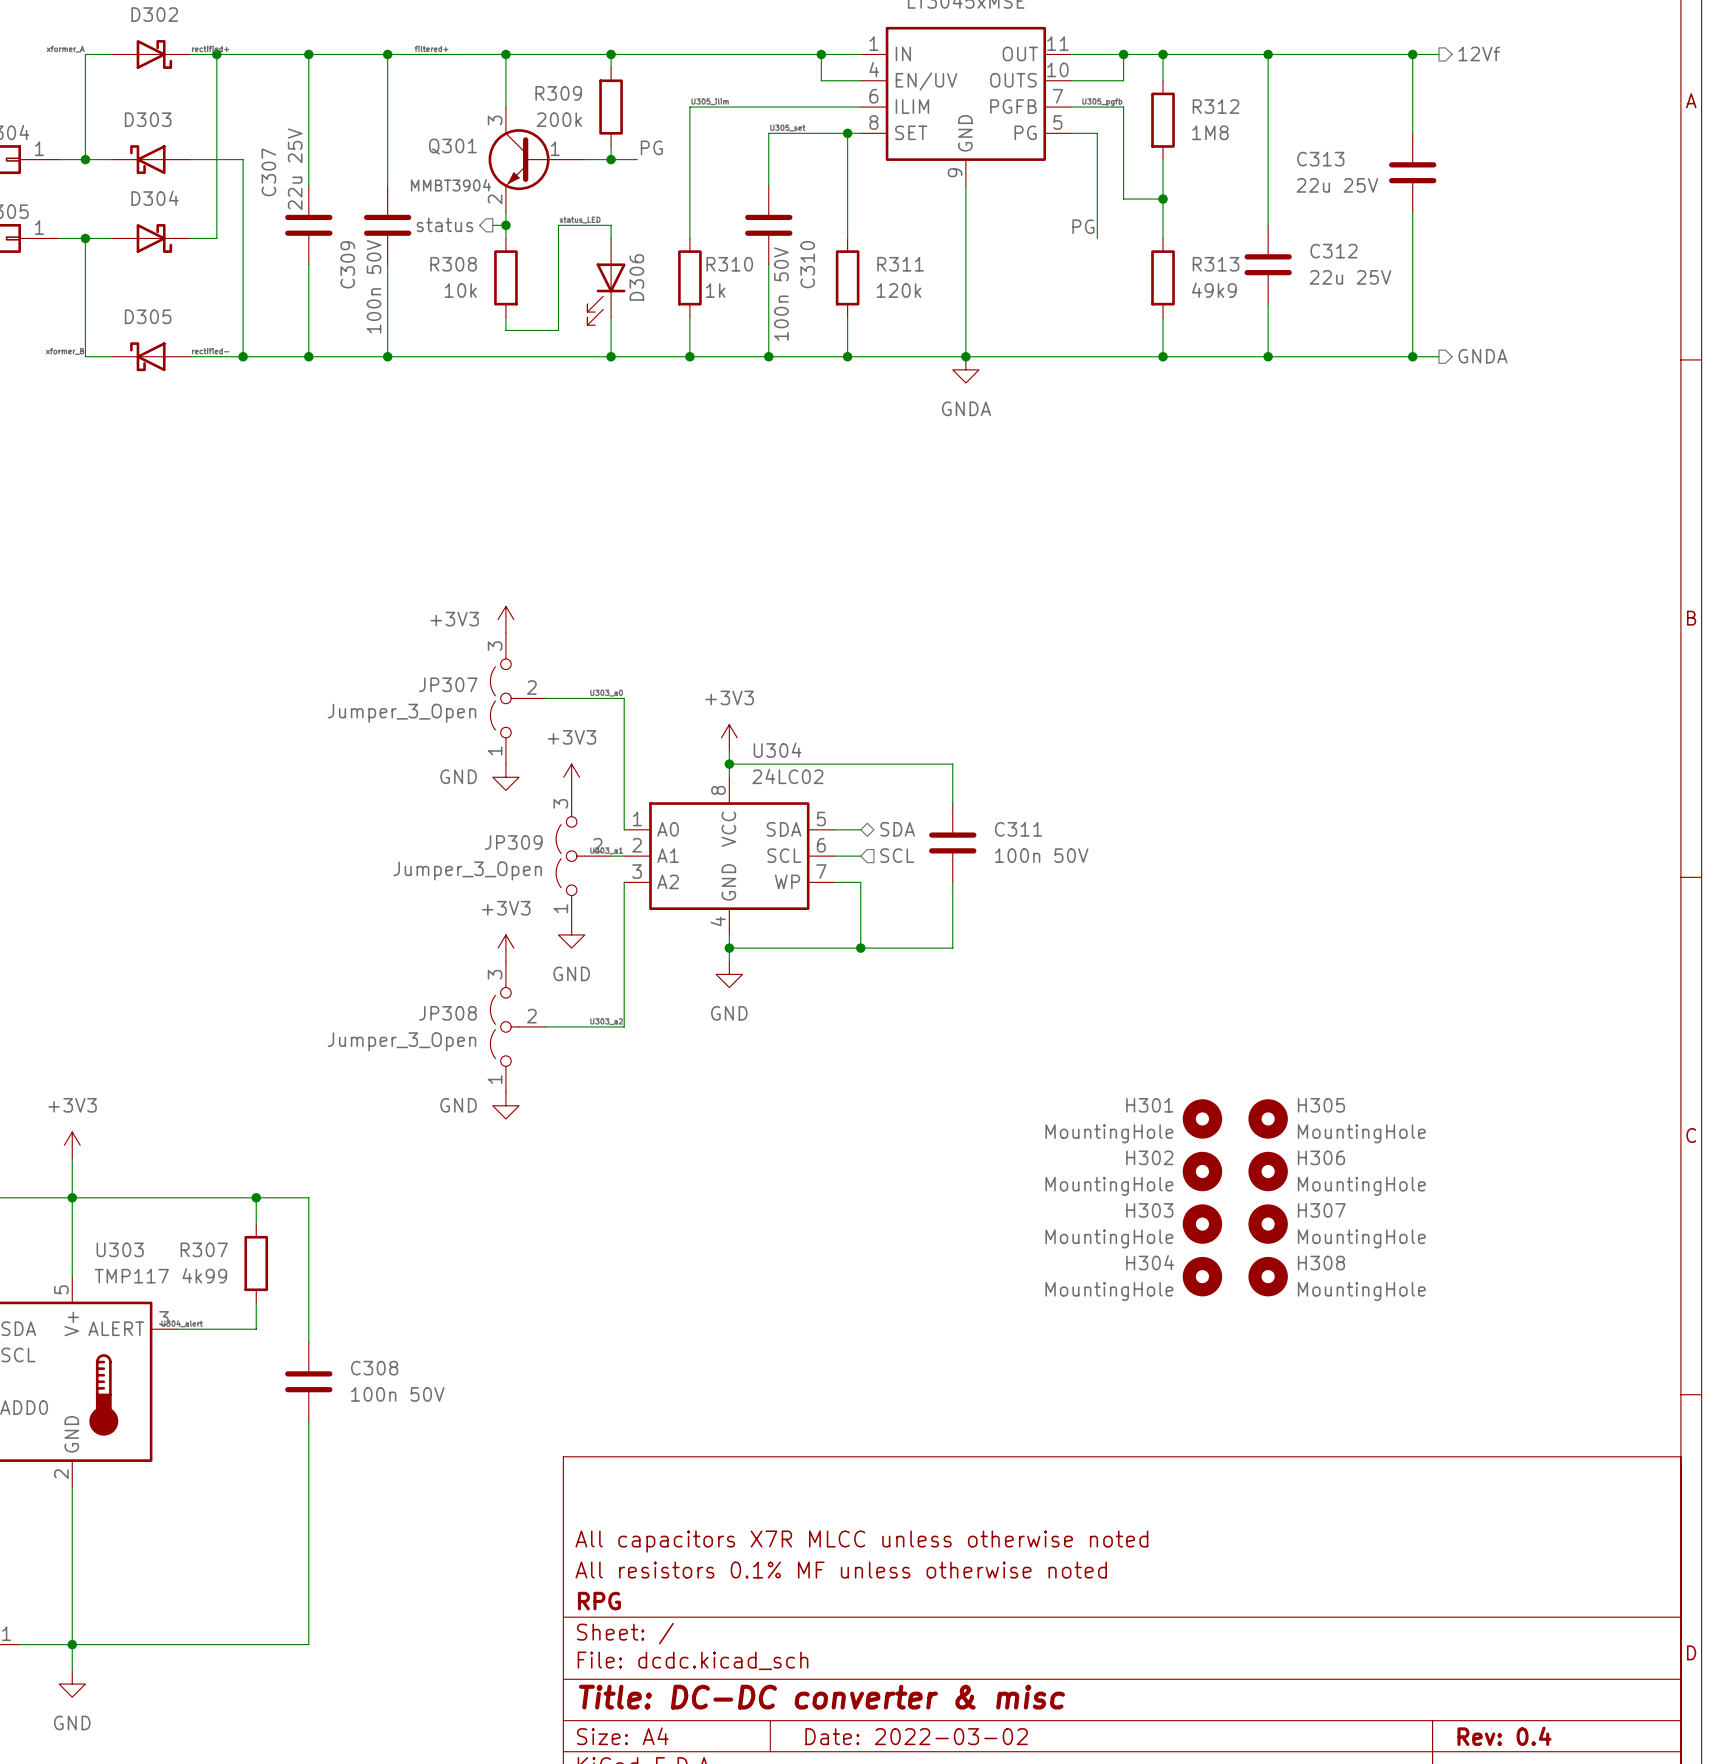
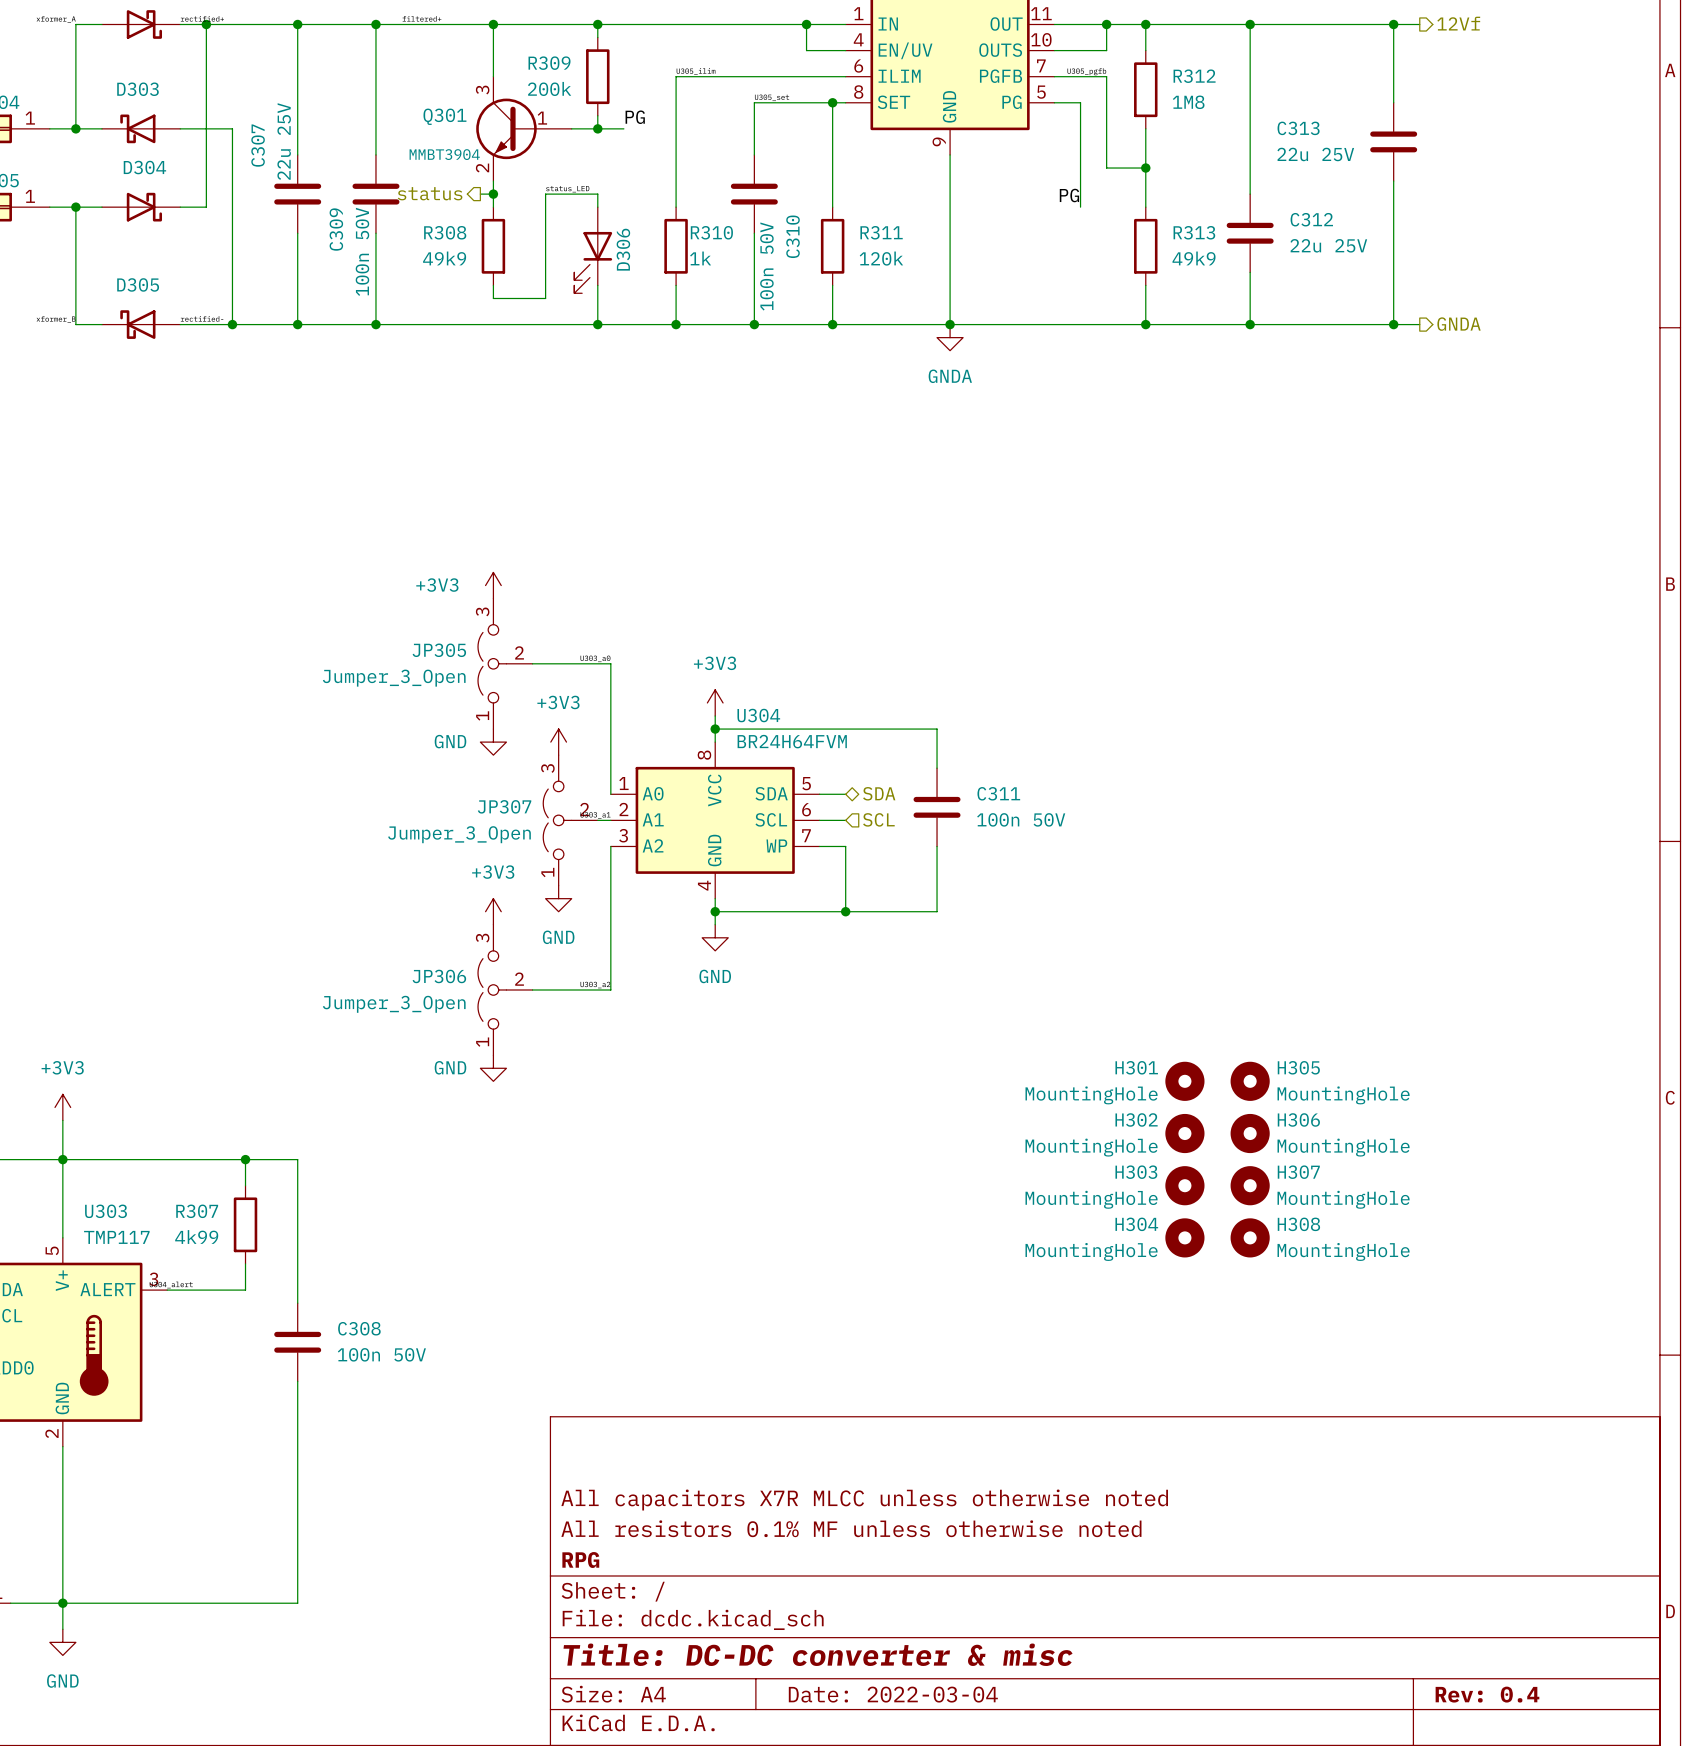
R308 value: 10k (460, 290) -> 49k9 (444, 258)
JP307 name: JP307 (448, 684) -> JP305 (439, 650)
U304 value: 24LC02 (787, 776) -> BR24H64FVM (792, 741)
JP309 name: JP309 (513, 842) -> JP307 (504, 806)
JP308 name: JP308 (447, 1013) -> JP306 (439, 976)
title block: Date: 2022-03-02 (916, 1736) -> Date: 2022-03-04 (893, 1694)

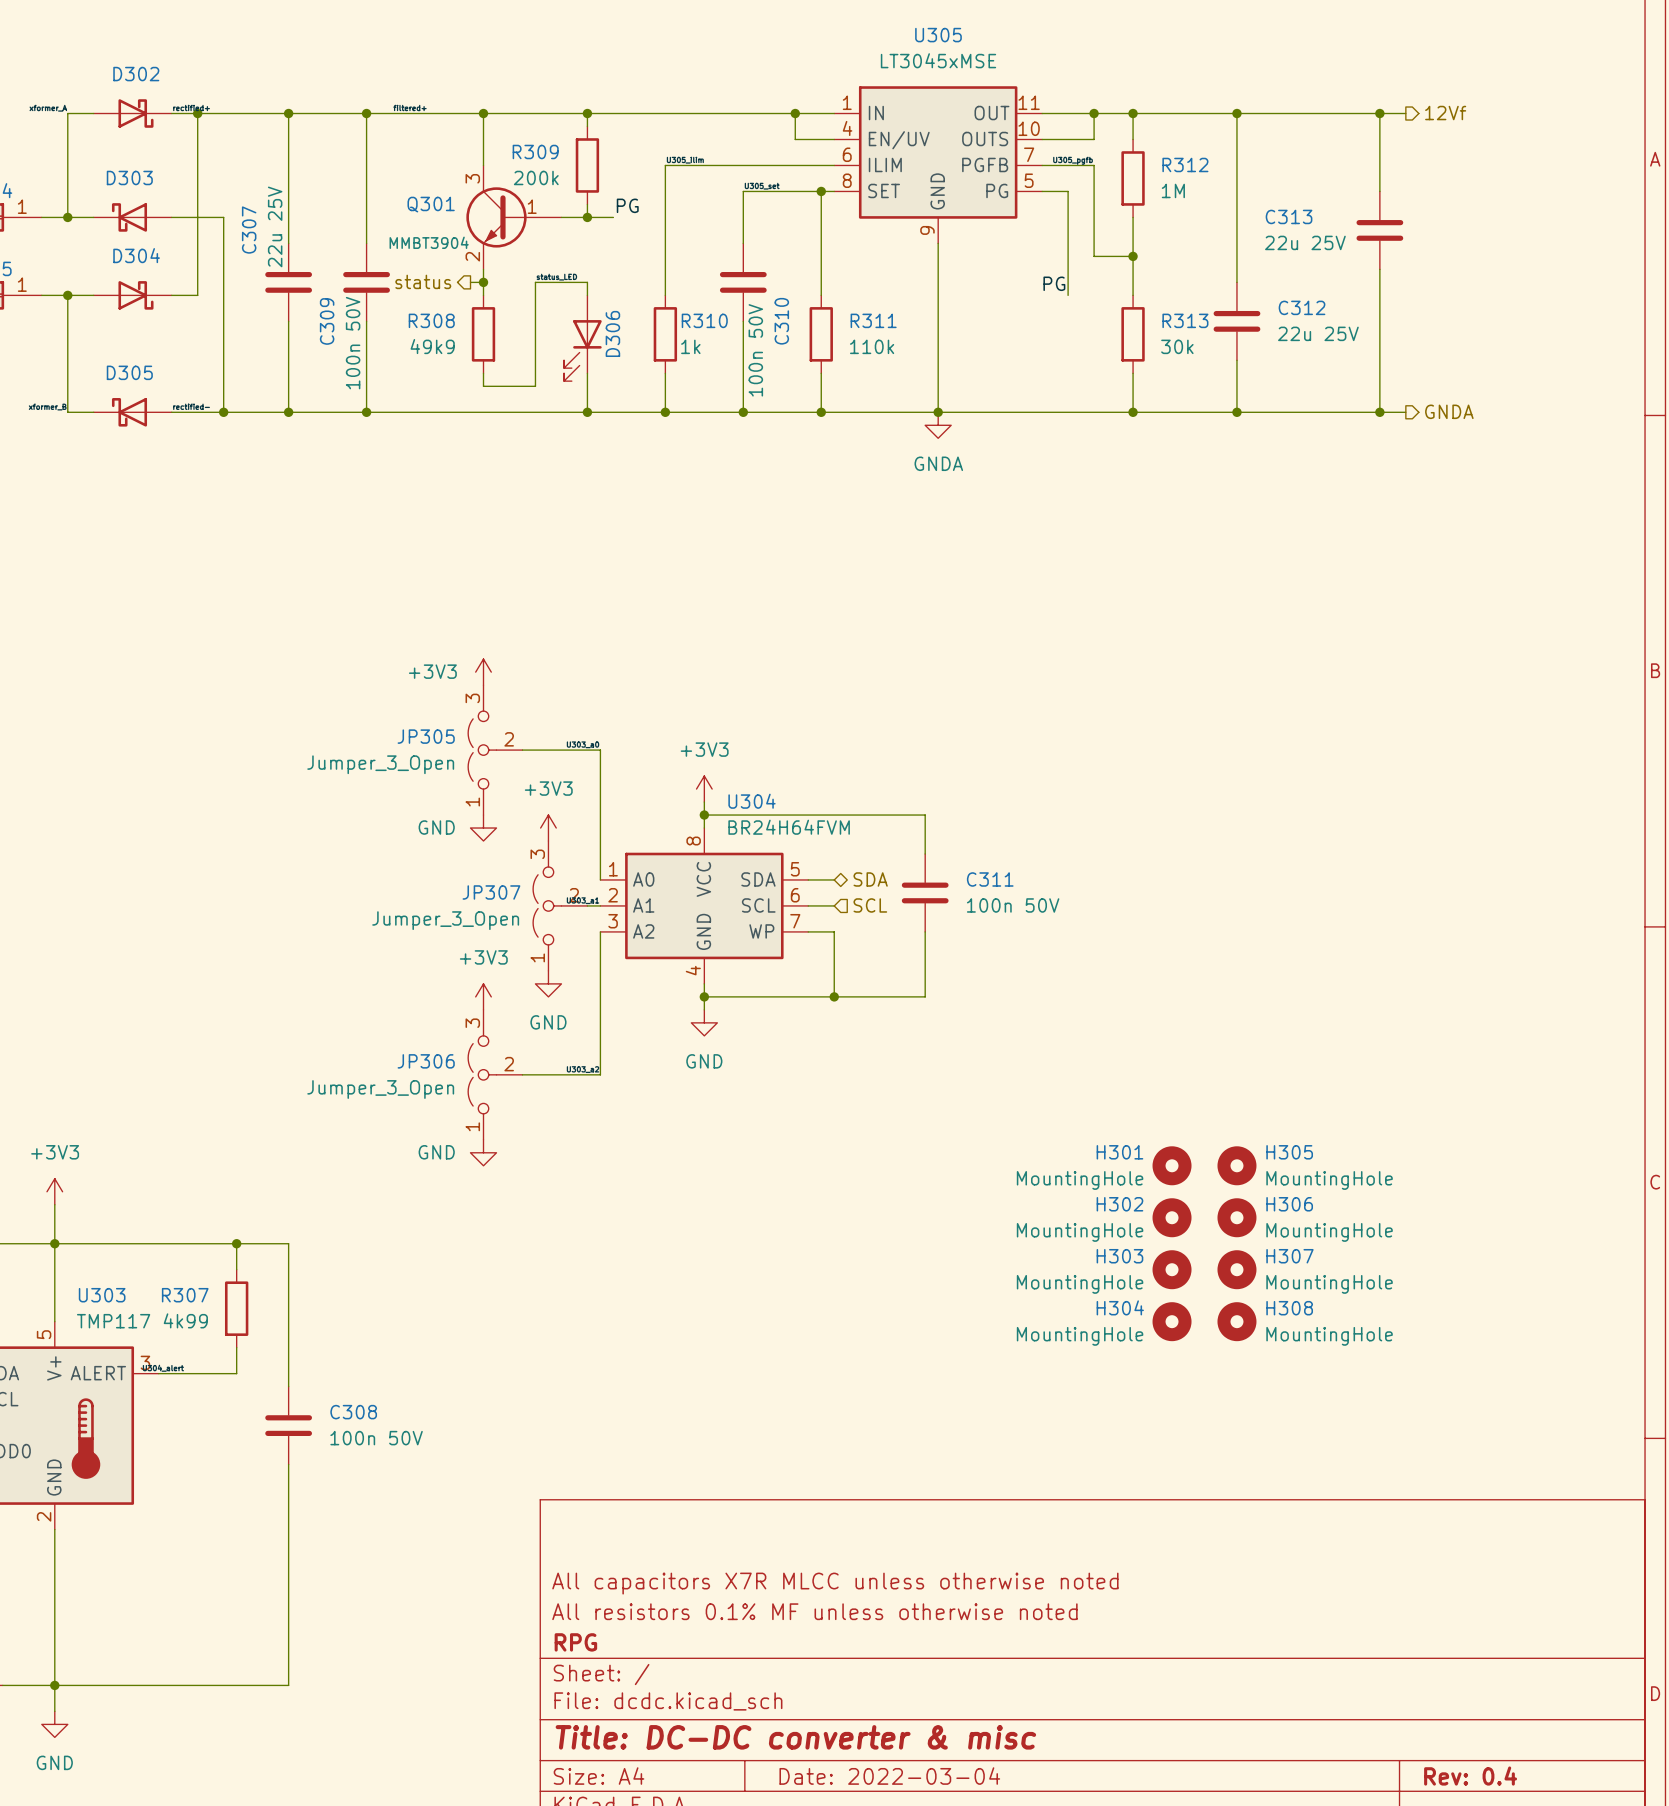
R312 value: 1M8 (1188, 102) -> 1M (1173, 190)
R311 value: 120k (881, 258) -> 110k (872, 346)
R313 value: 49k9 (1194, 258) -> 30k (1177, 346)

